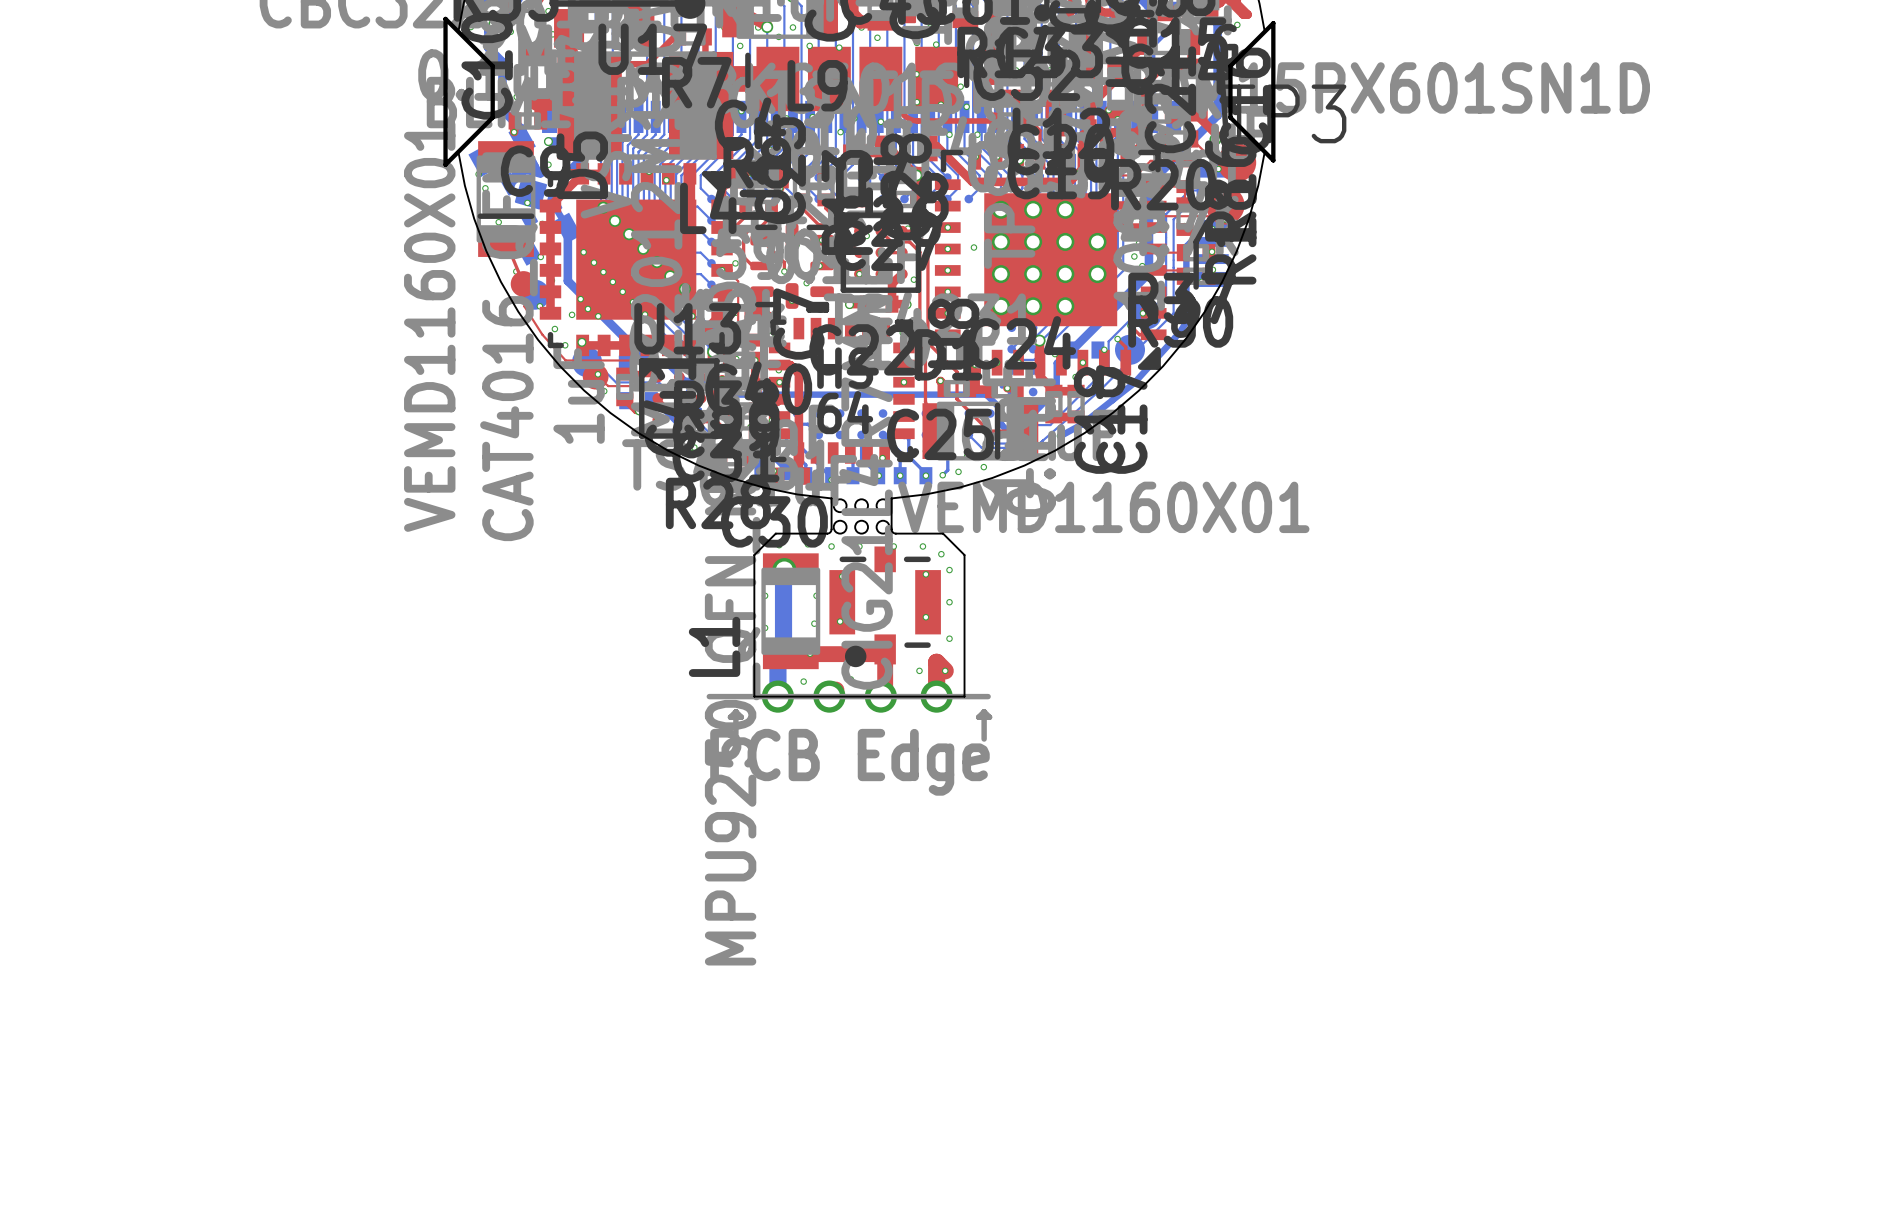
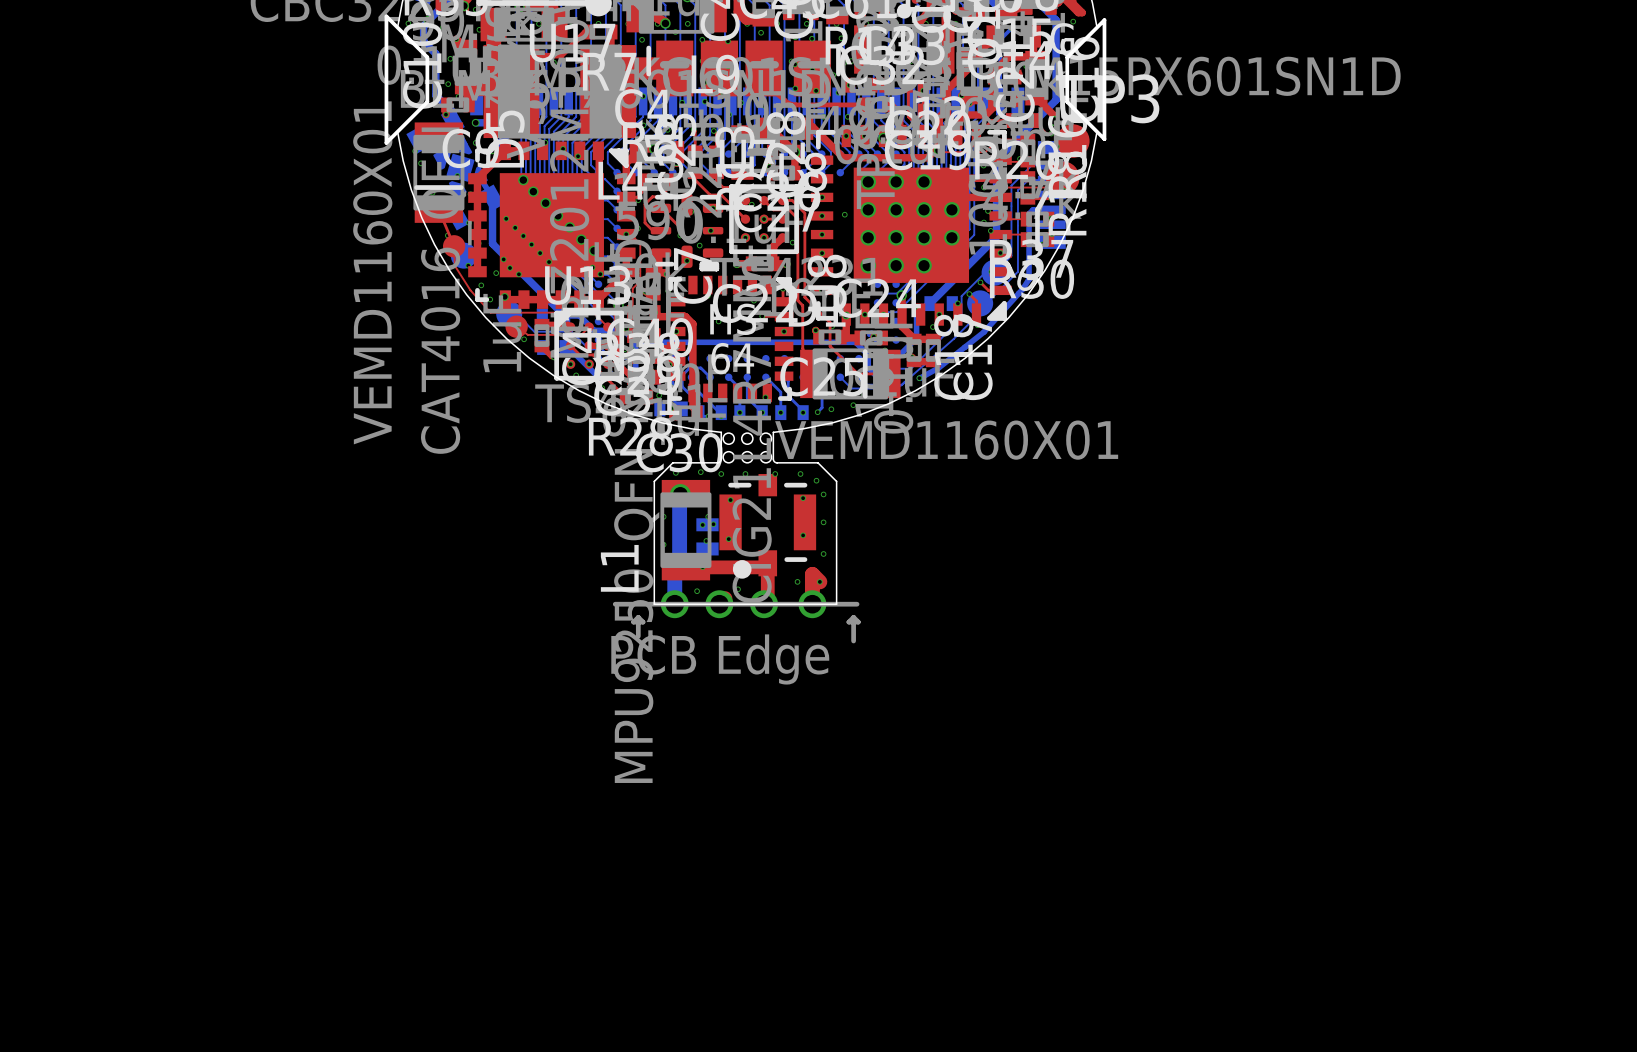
via: none -> (713, 524)
via: none -> (702, 524)
part: none -> (707, 536)

